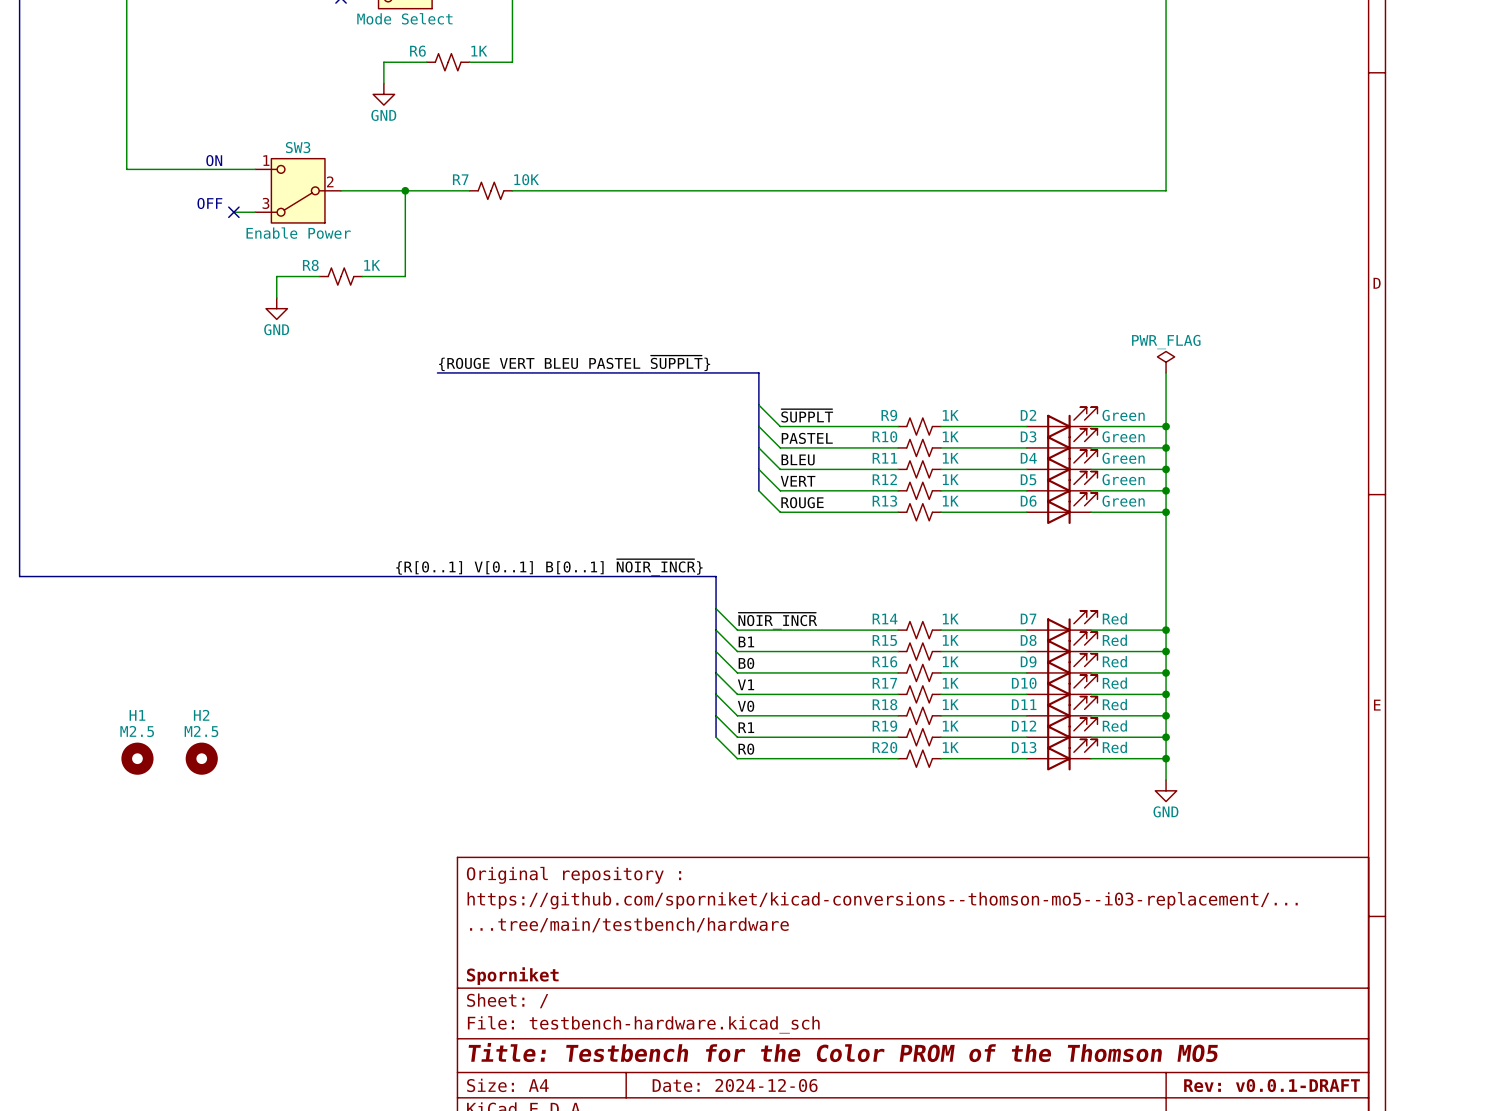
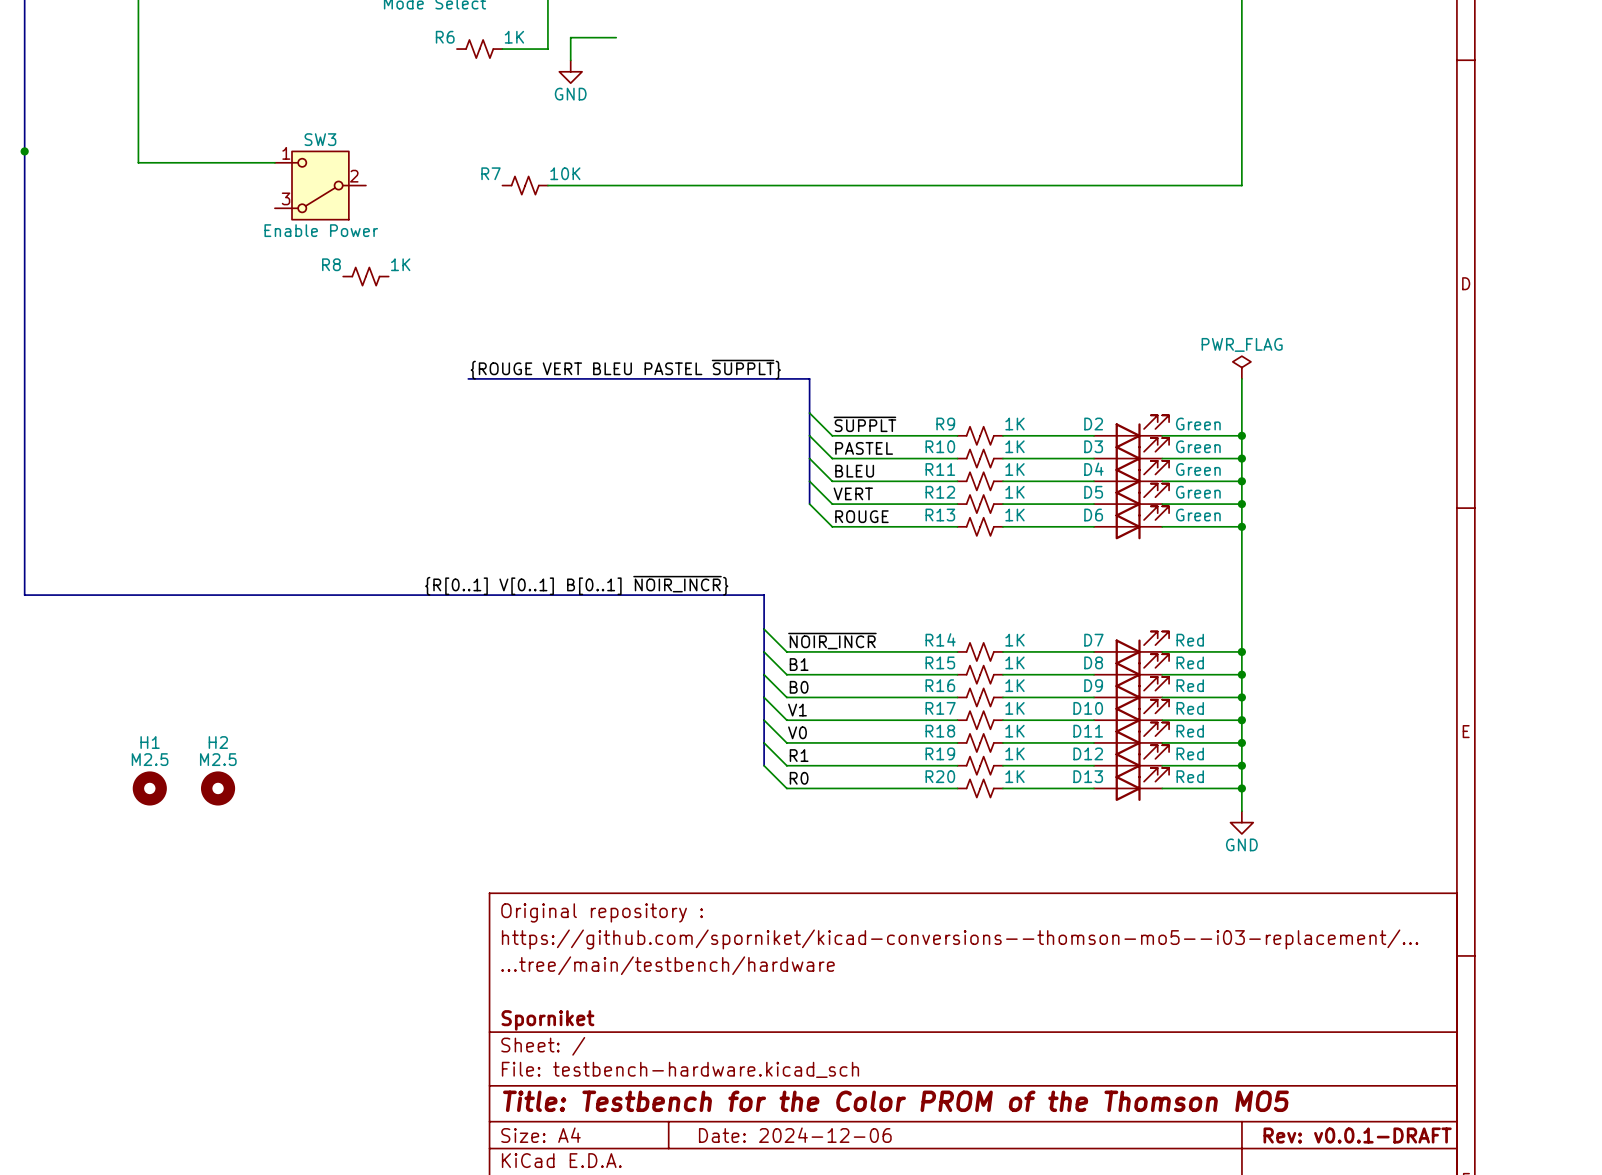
wire: (426, 62) (383, 62) (383, 83) -> (616, 37) (570, 37) (570, 60)
power symbol: none -> GND (570, 71)
power symbol: GND (383, 94) -> none
junction: none -> (24, 151)
text: ON (214, 160) -> none
wire: (341, 190) (469, 190) -> none
wire: (405, 190) (405, 276) (362, 276) -> none
junction: (405, 190) -> none
text: OFF (209, 203) -> none
wire: (233, 212) (255, 212) -> none
no-connect mark: (233, 212) -> none
wire: (319, 276) (276, 276) (276, 297) -> none
power symbol: GND (276, 308) -> none

